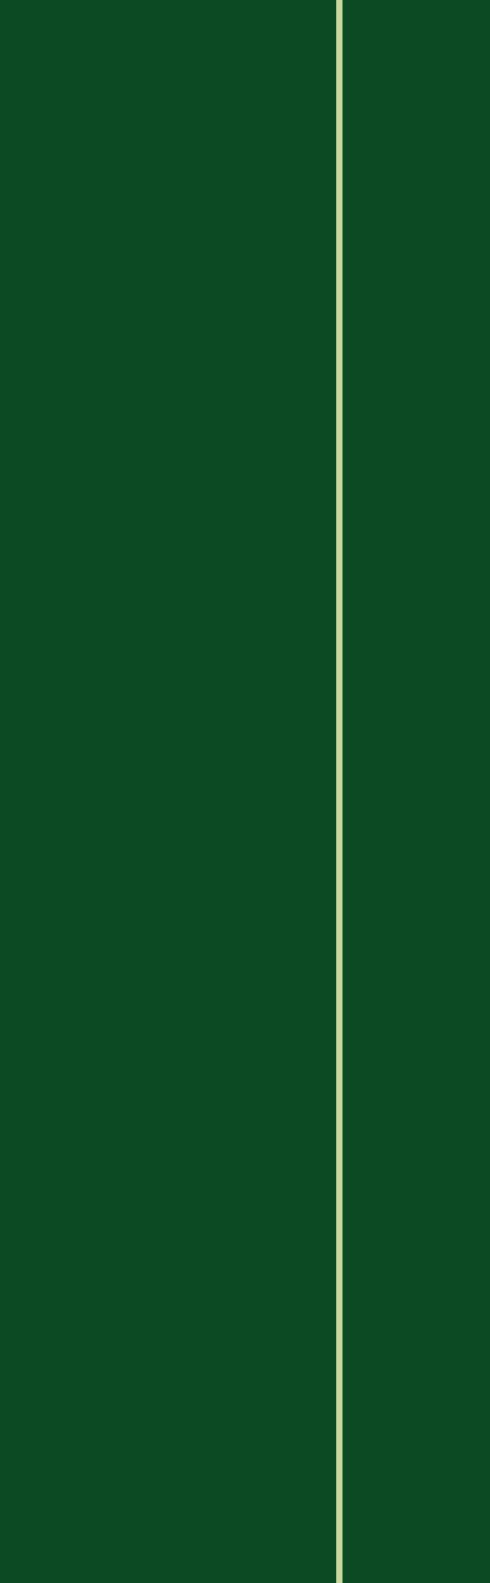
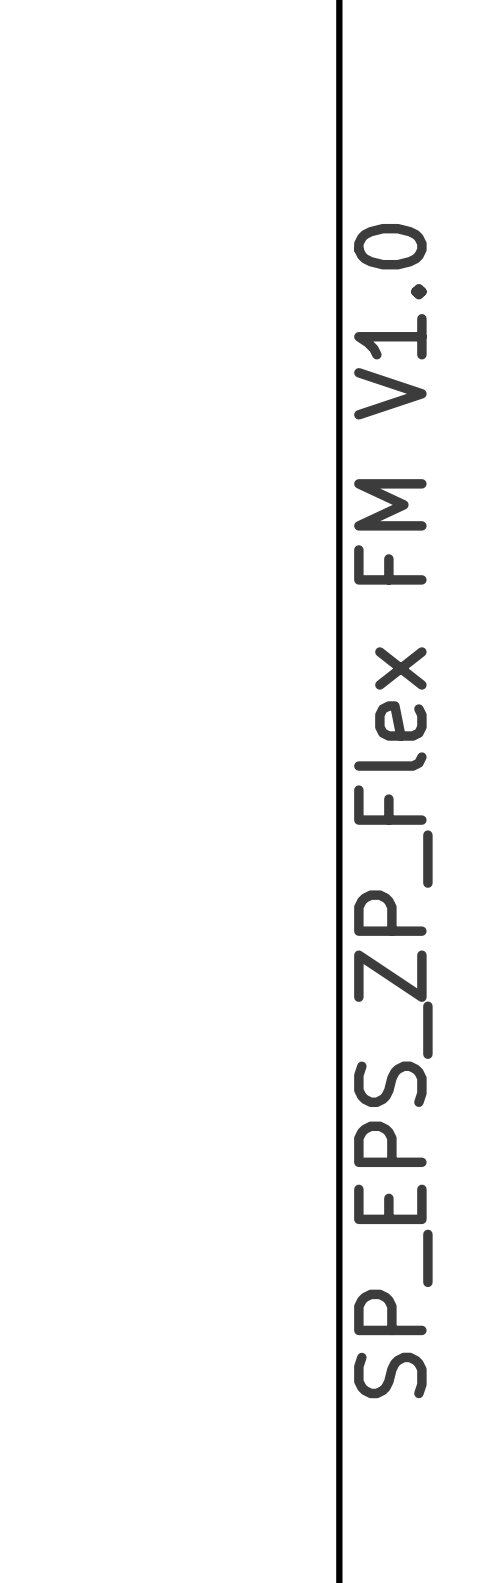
text: none -> SP_EPS_ZP_Flex FM V1.0 (393, 811)

